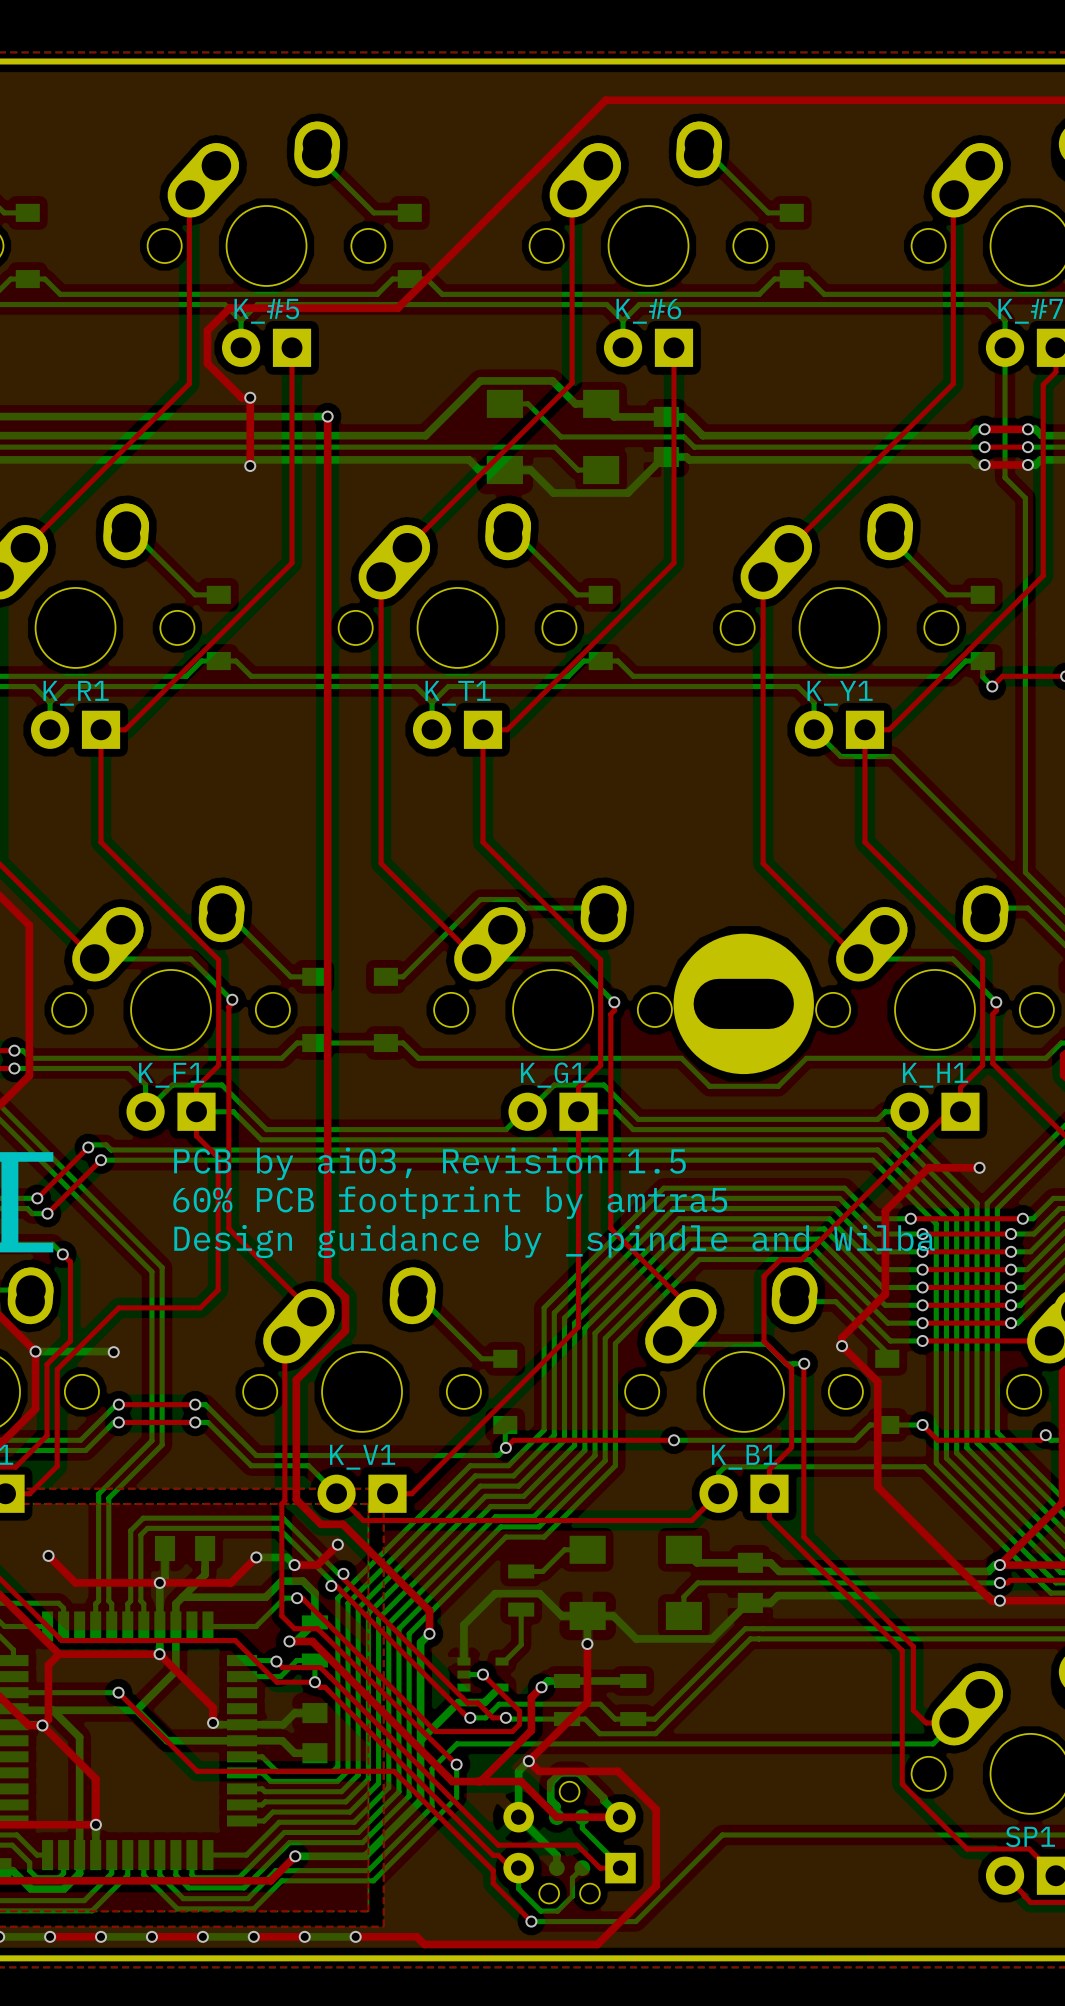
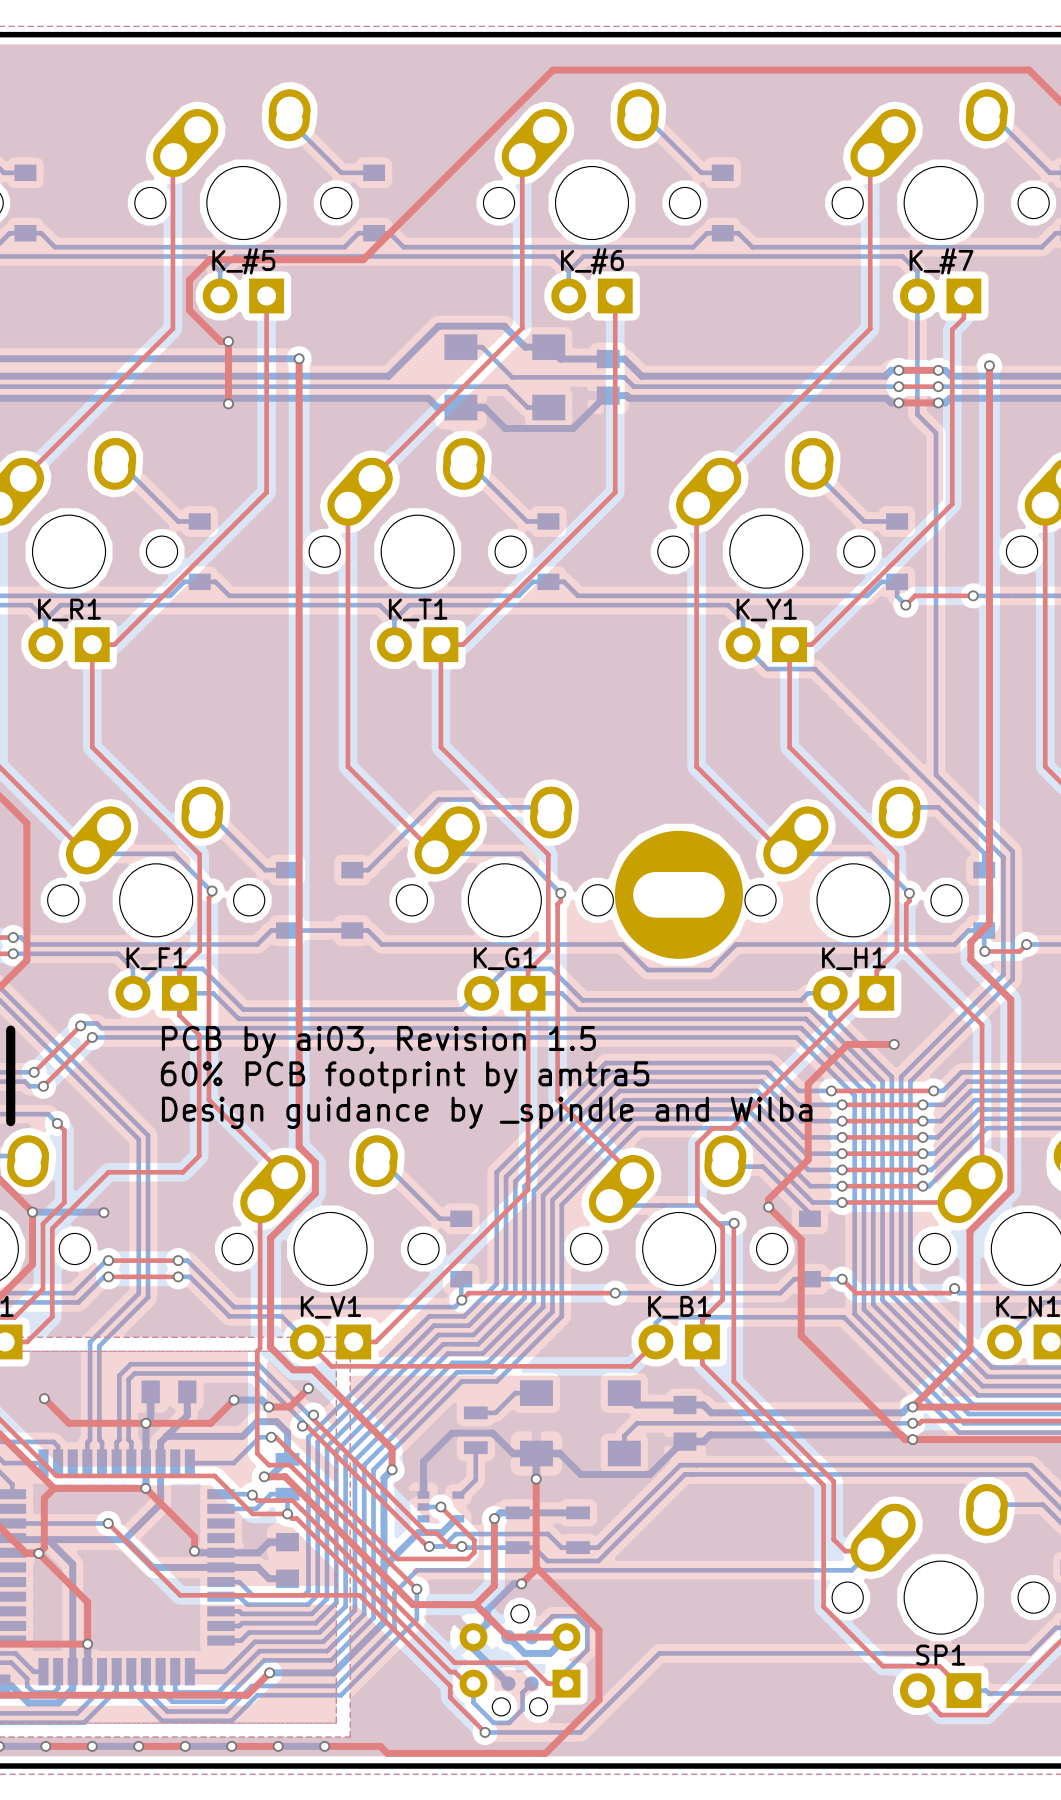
top track: (541, 1687) (531, 1697) (531, 1730) (480, 1781) -> (494, 1518) (494, 1586) (475, 1604)
top track: (587, 1702) (528, 1761) (539, 1771) (617, 1771) -> (536, 1567) (564, 1595)
top track: none -> (536, 1532) (536, 1569) (521, 1583)
bottom track: (528, 1761) (518, 1771) (518, 1817) (556, 1855) (556, 1868) -> (521, 1583) (513, 1583) (487, 1610) (487, 1623) (473, 1637) (473, 1648) (508, 1683)
via position: (528, 1761) -> (521, 1583)
bottom track: (556, 1817) (556, 1806) (550, 1799) (550, 1782) (560, 1772) (578, 1772) (620, 1817) -> (508, 1637) (524, 1653) (550, 1653) (566, 1637)
bottom track: (582, 1817) (582, 1828) (620, 1866) -> (531, 1637) (552, 1616) (576, 1616) (587, 1627) (587, 1649) (566, 1670) (566, 1682)

